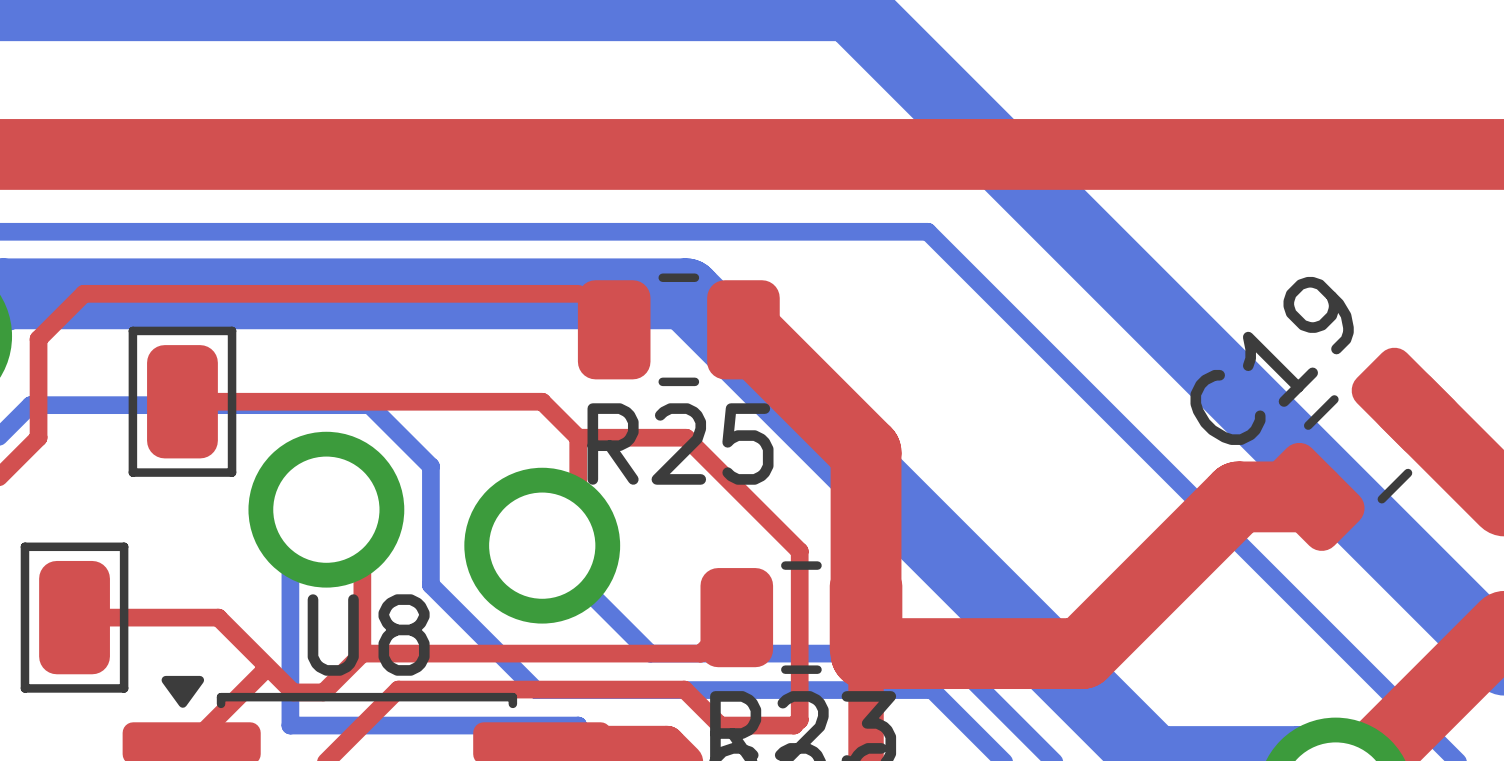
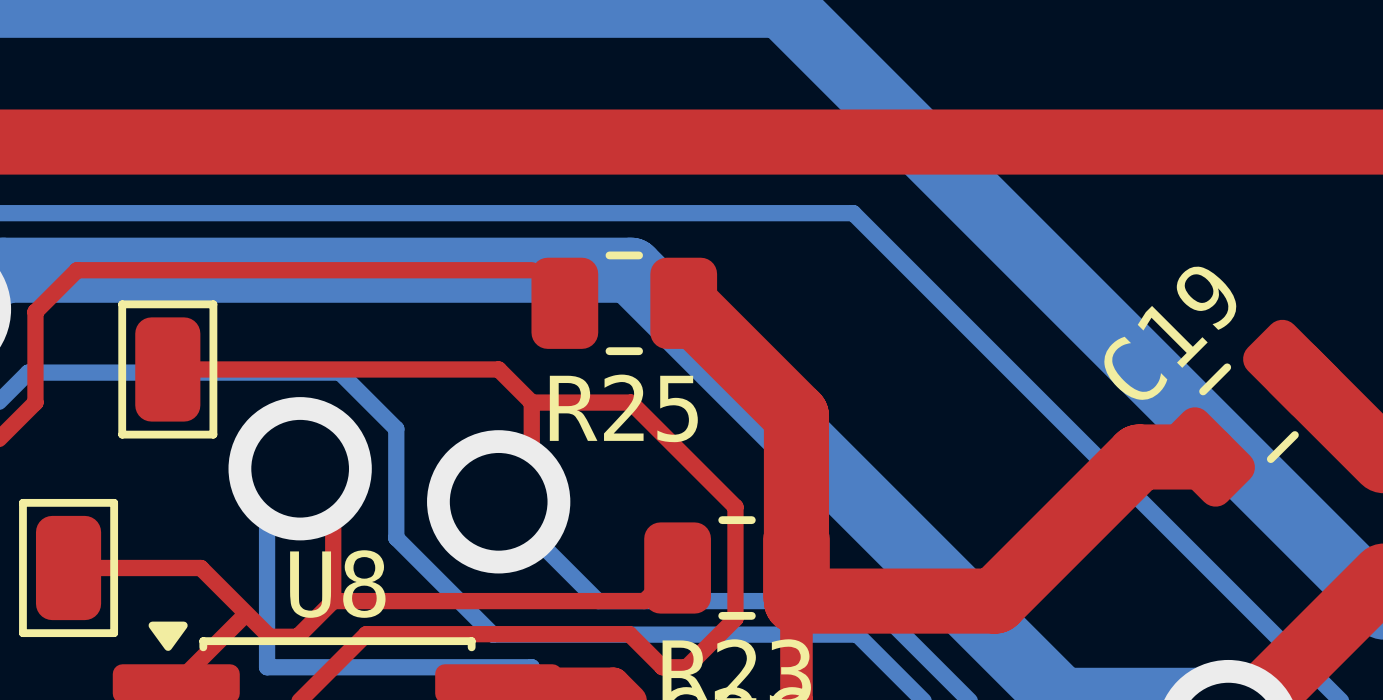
top track: (799, 672) (799, 719) (794, 725) (746, 725) -> (735, 618) (686, 667)

